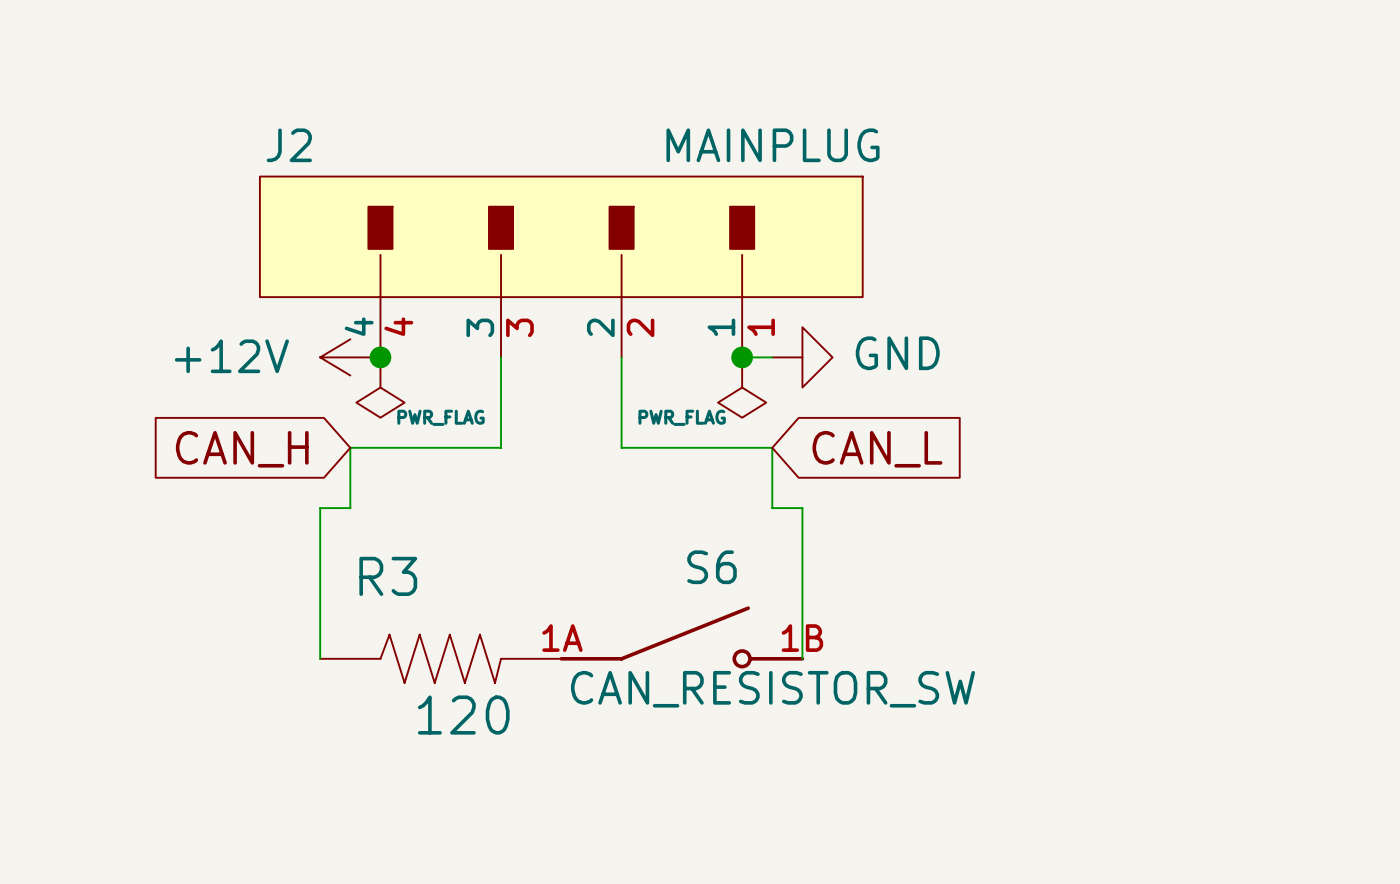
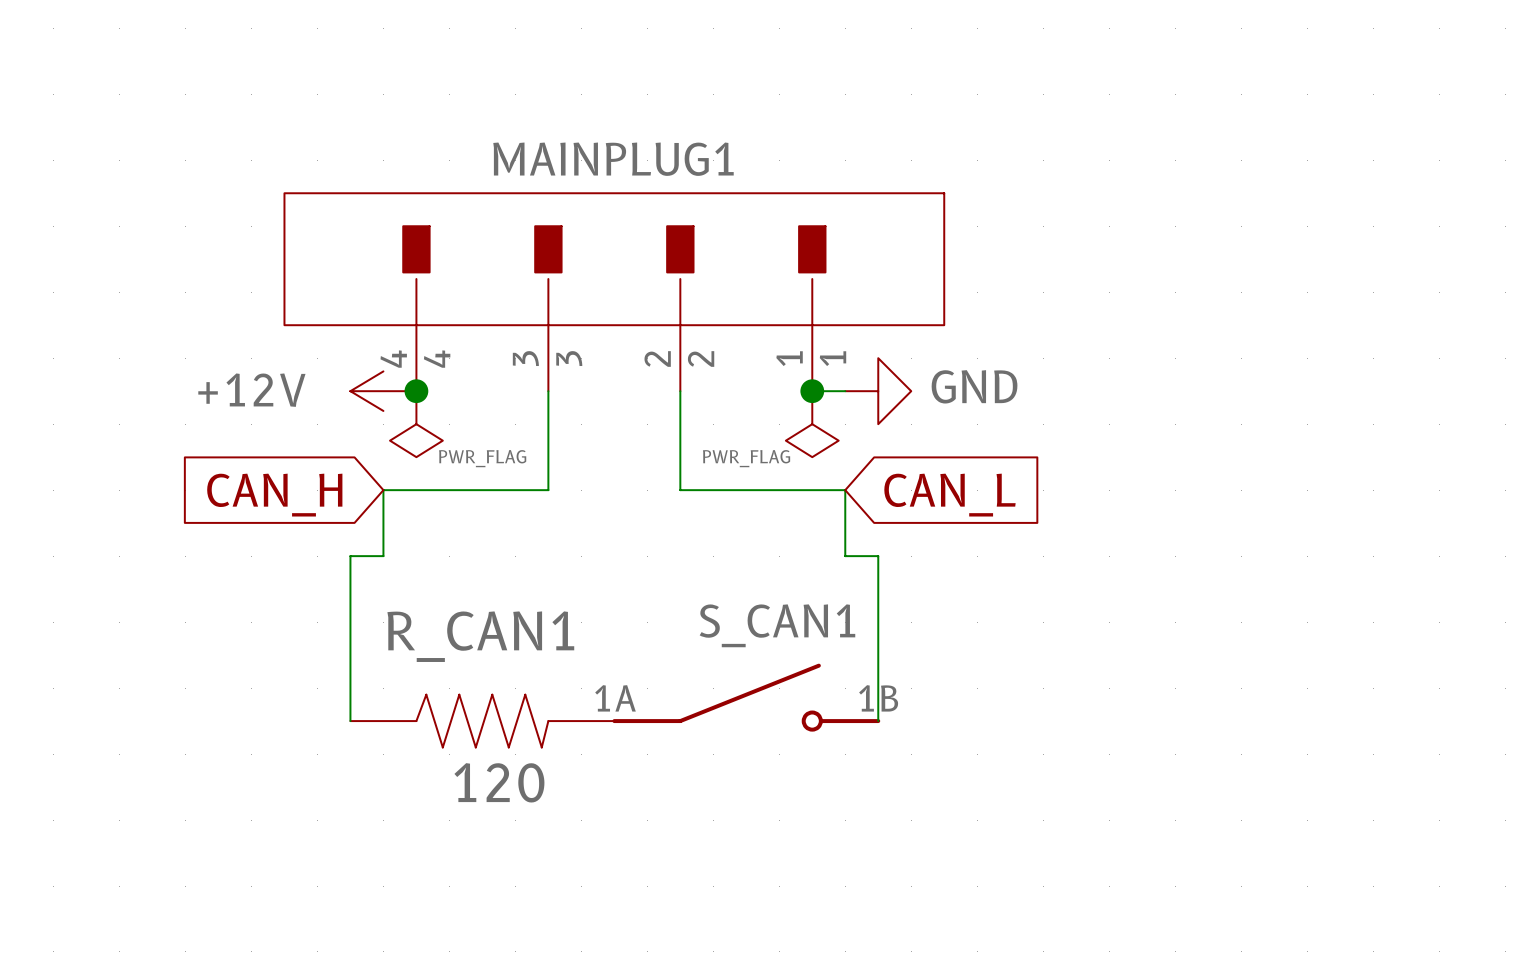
J2 name: J2 (289, 145) -> MAINPLUG1 (613, 159)
J2 value: MAINPLUG (773, 145) -> none
S6 name: S6 (712, 567) -> S_CAN1 (777, 625)
R3 name: R3 (388, 576) -> R_CAN1 (480, 636)
S6 value: CAN_RESISTOR_SW (773, 689) -> none

